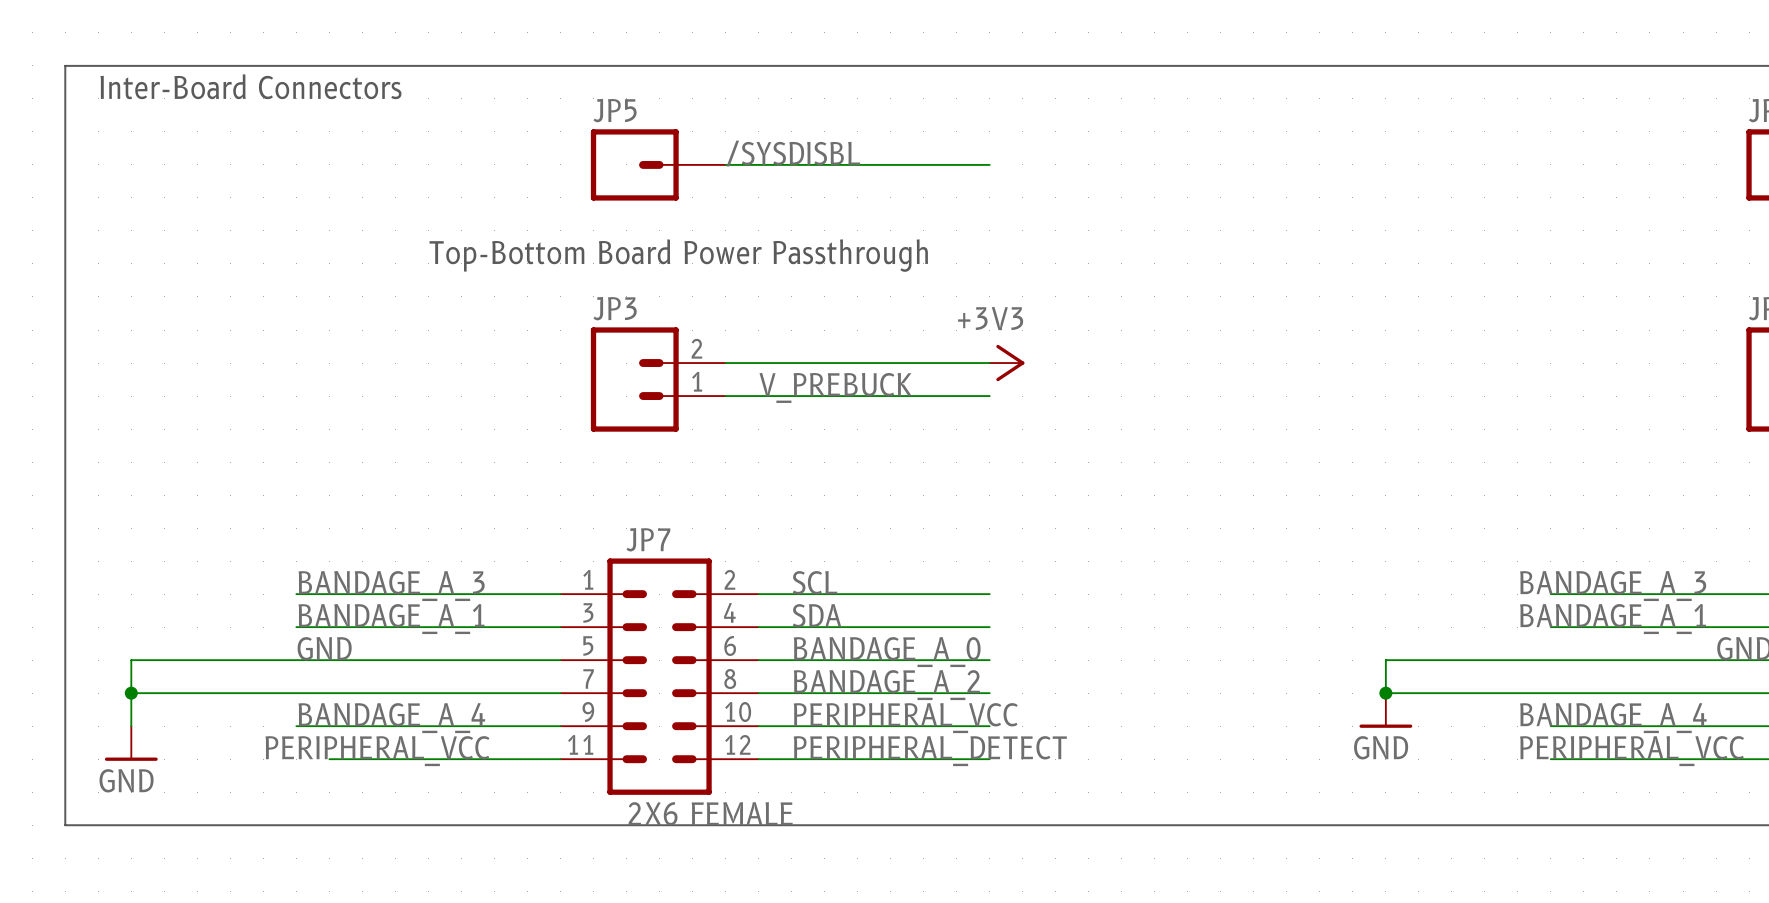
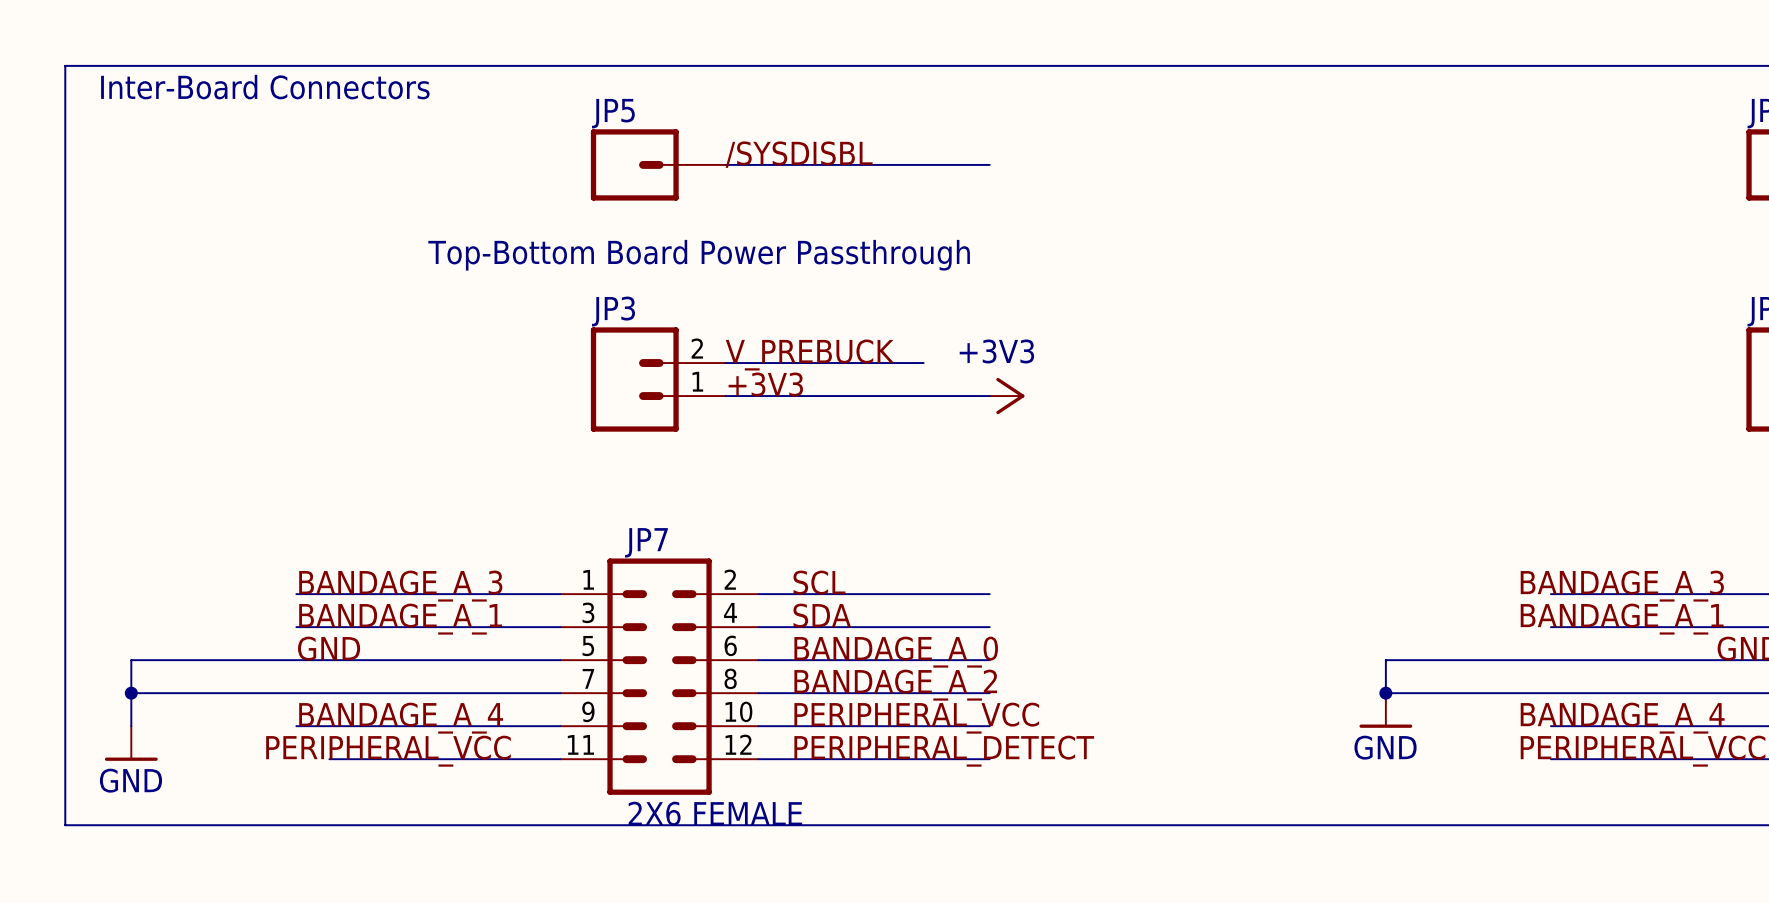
wire: (923, 363) (989, 363) -> none
power symbol position: +3V3 (1007, 363) -> +3V3 (1007, 396)
label: none -> +3V3 (765, 384)
label position: V_PREBUCK (835, 387) -> V_PREBUCK (809, 354)

